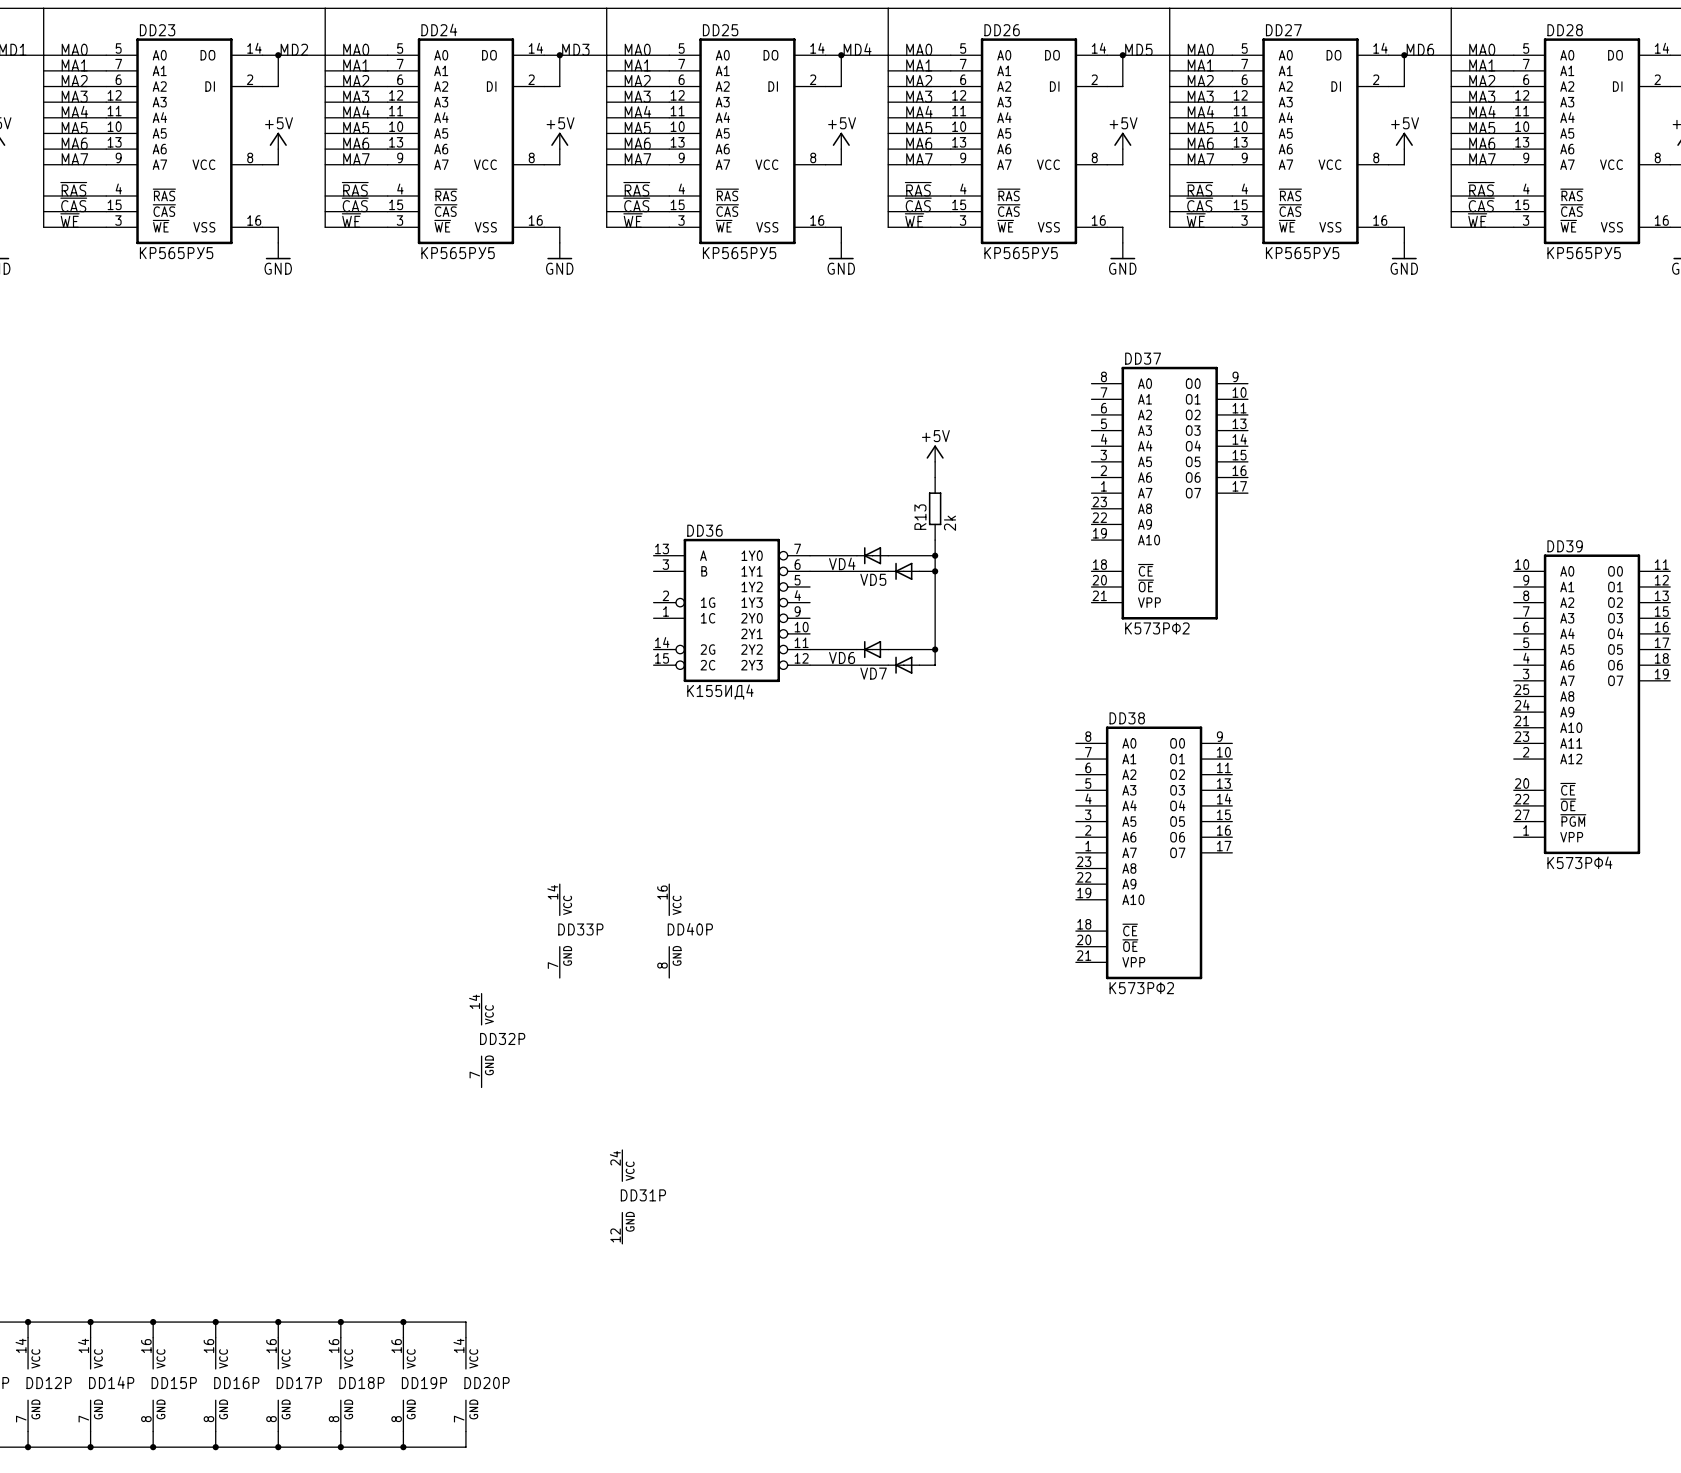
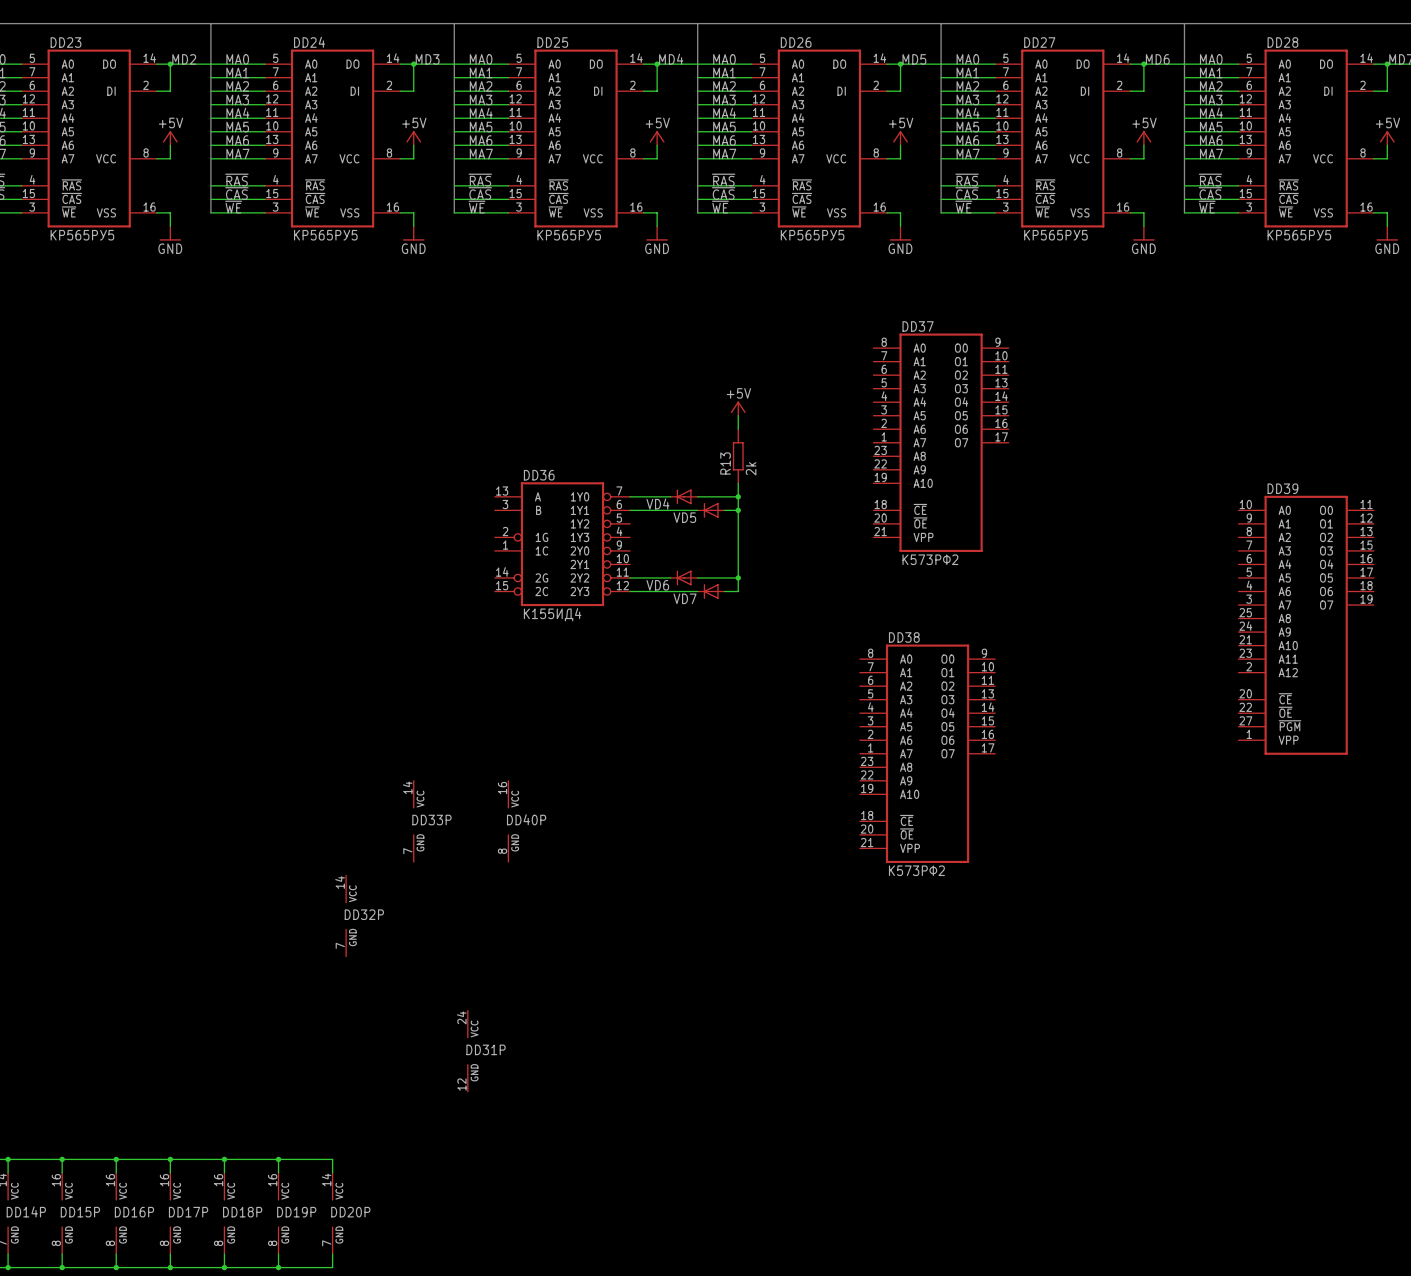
DD39 value: К573РФ4 (1579, 862) -> none

